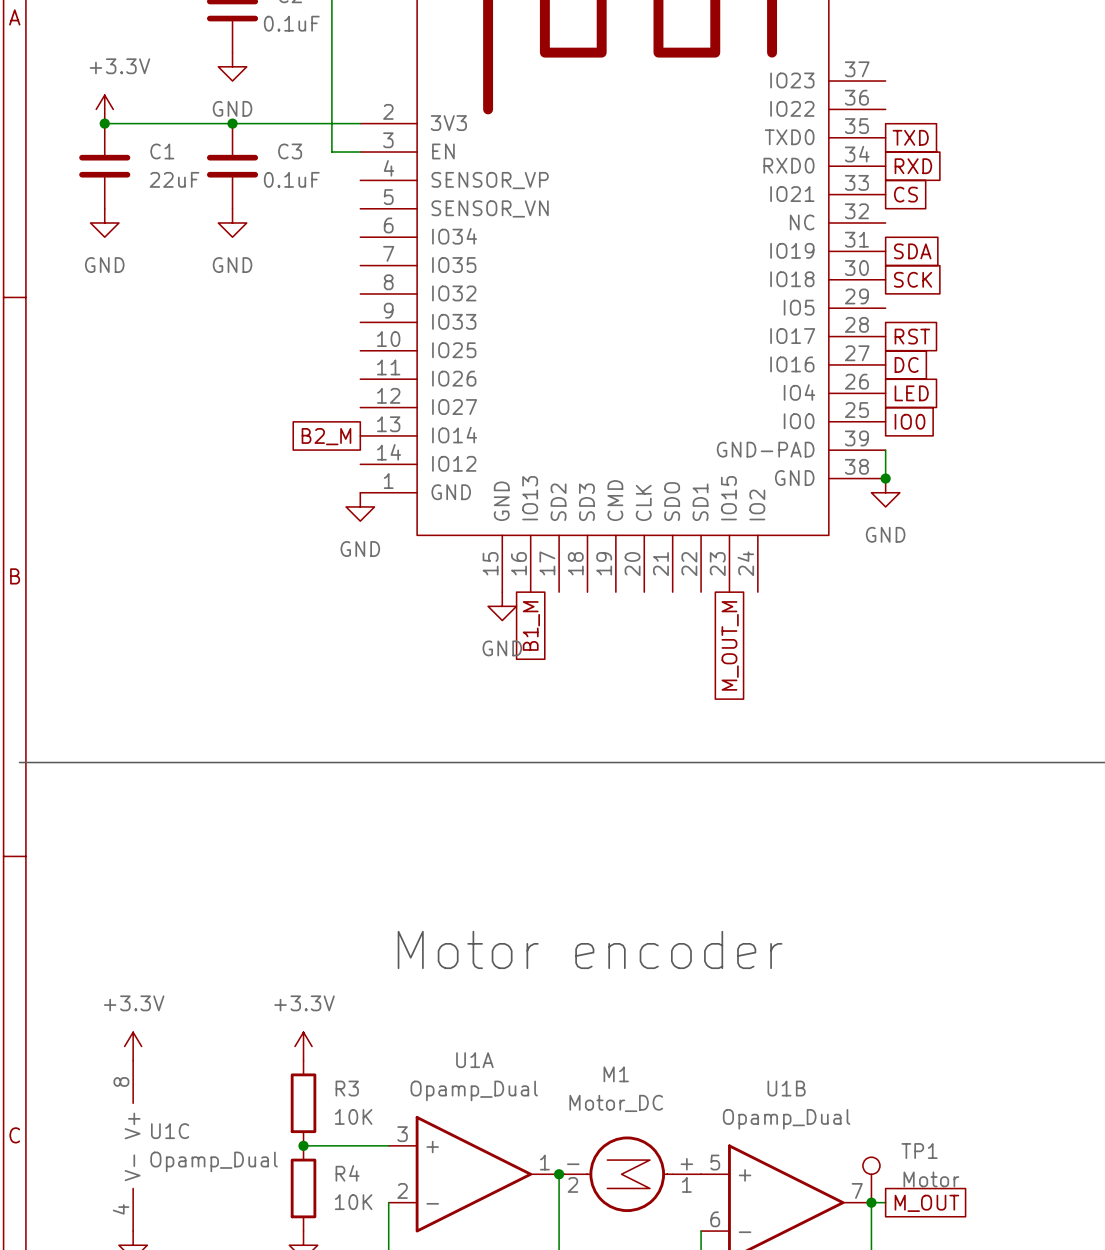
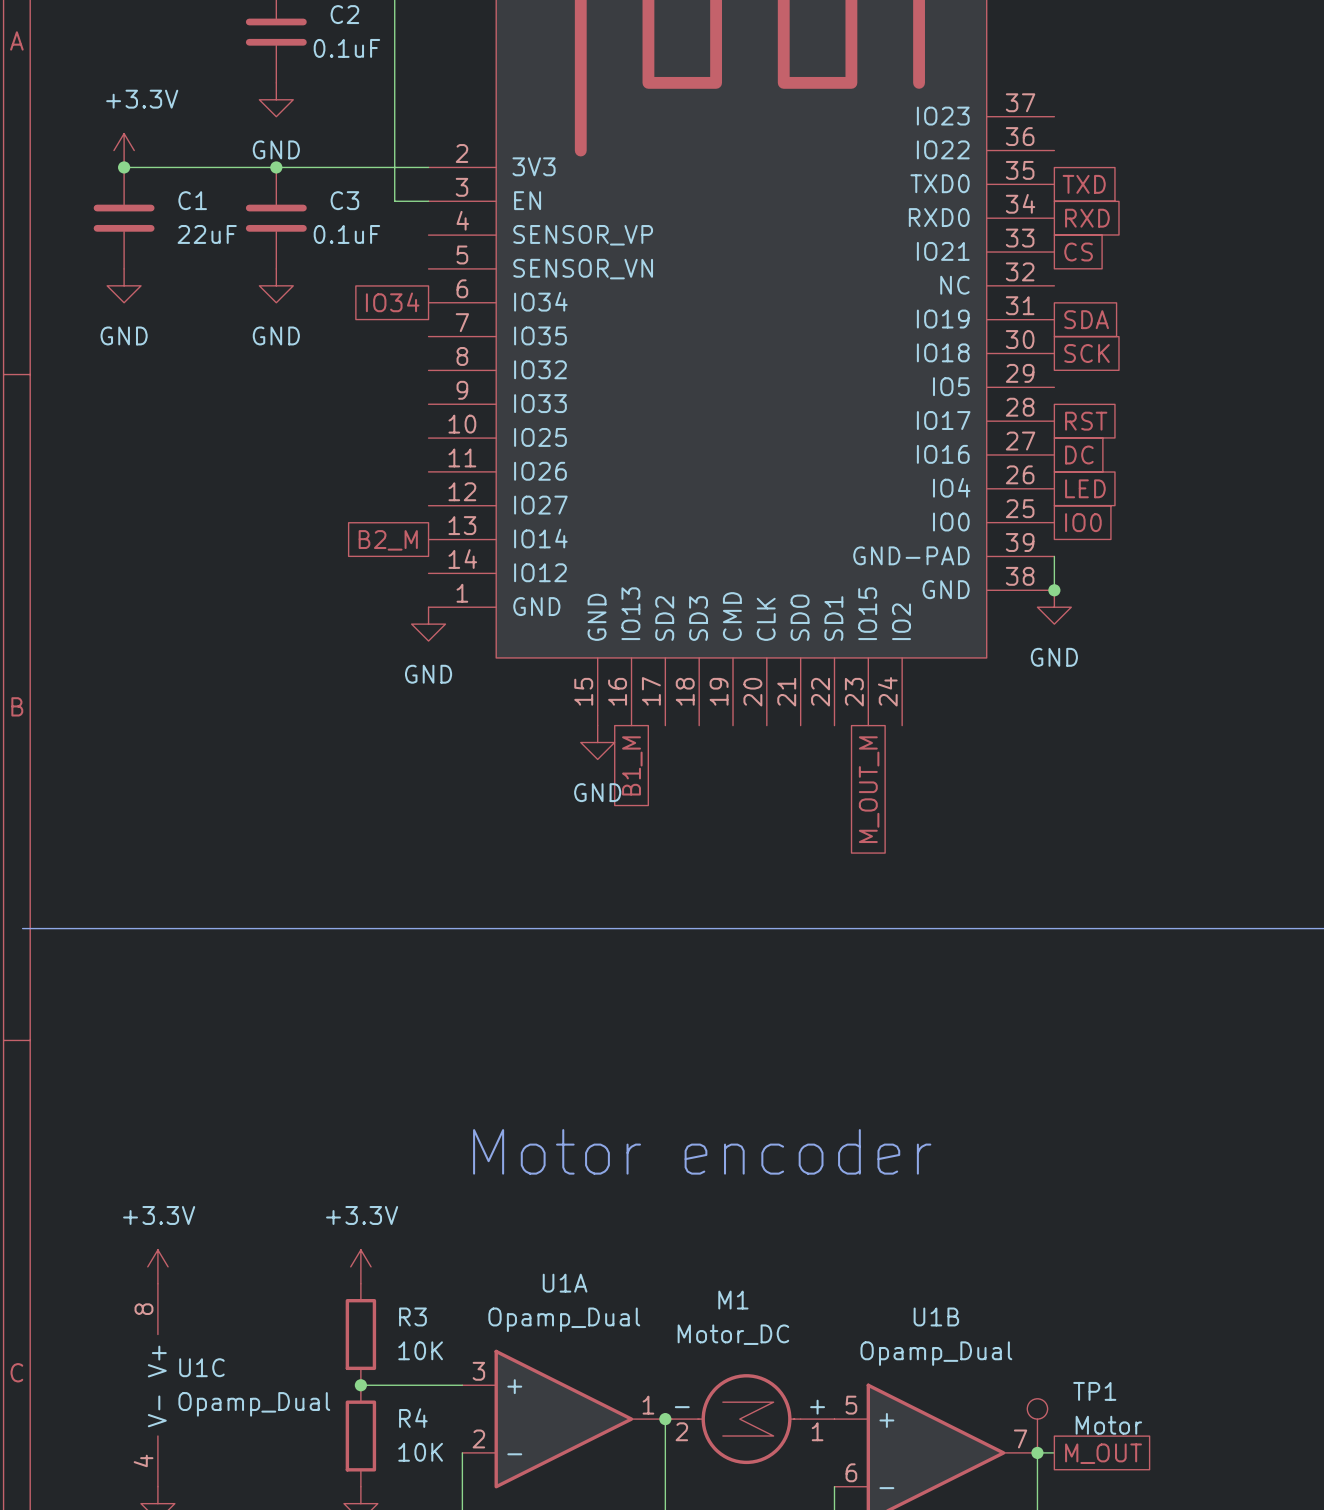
global label: none -> IO34 (392, 302)

